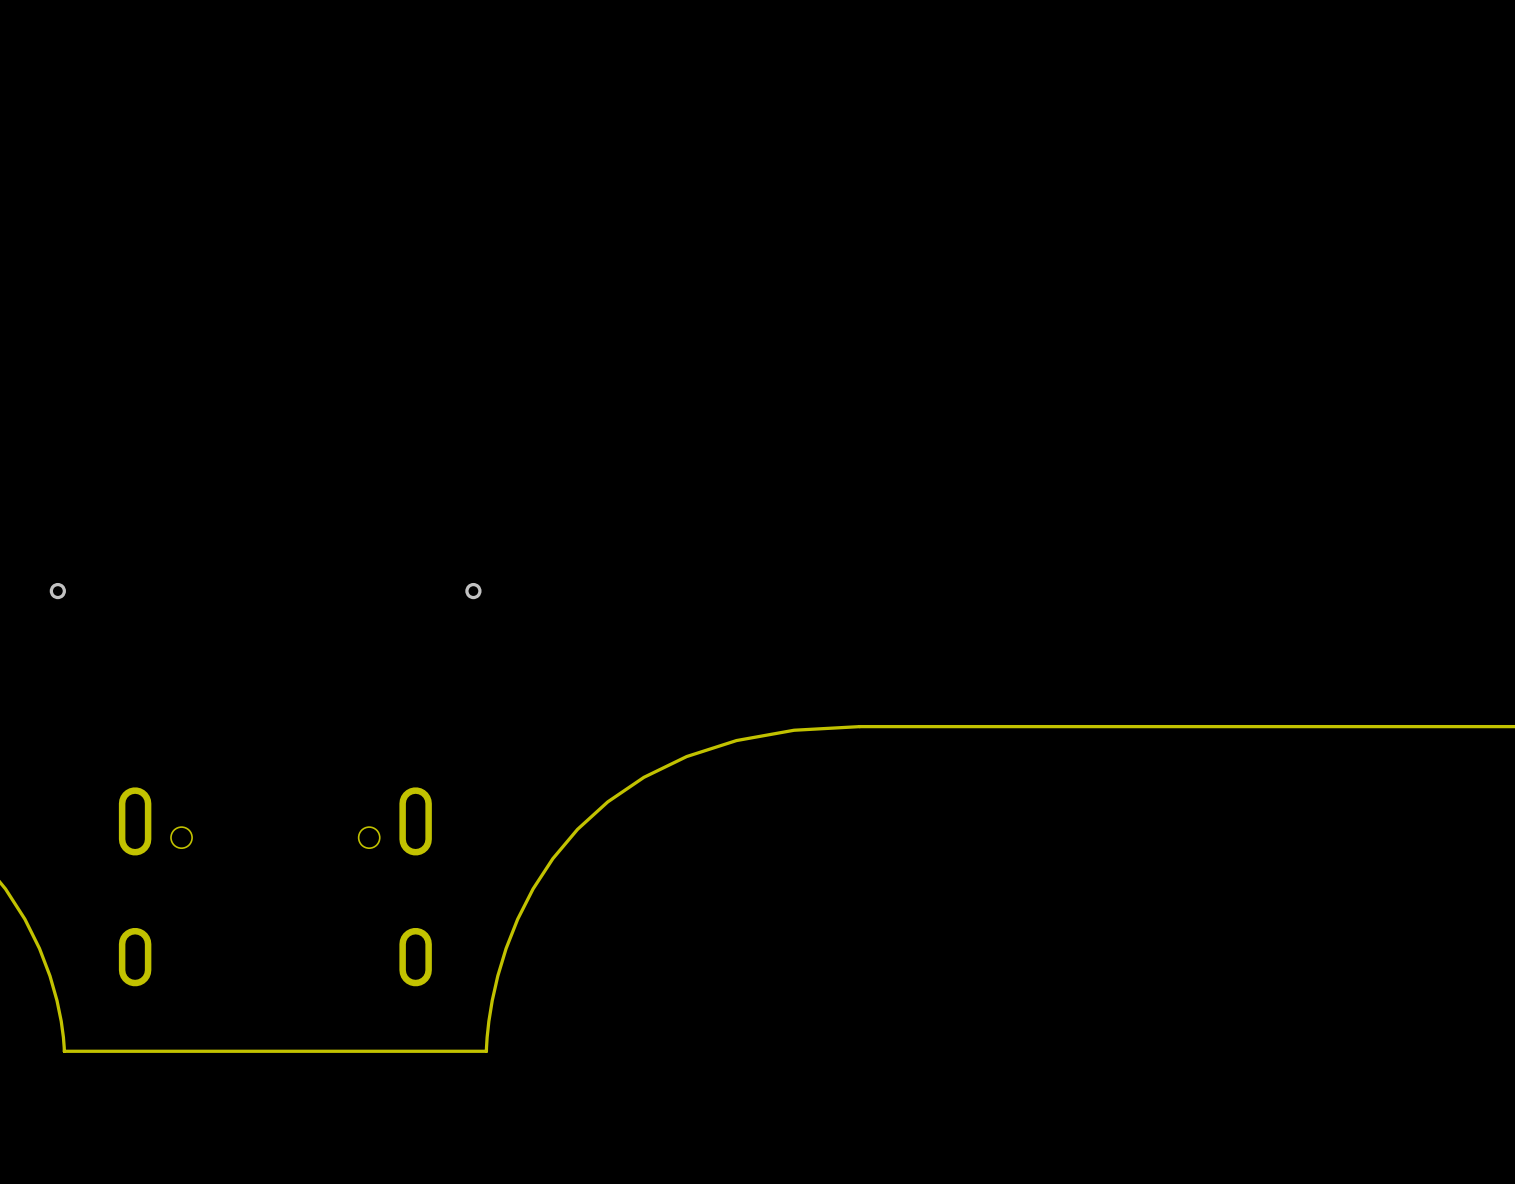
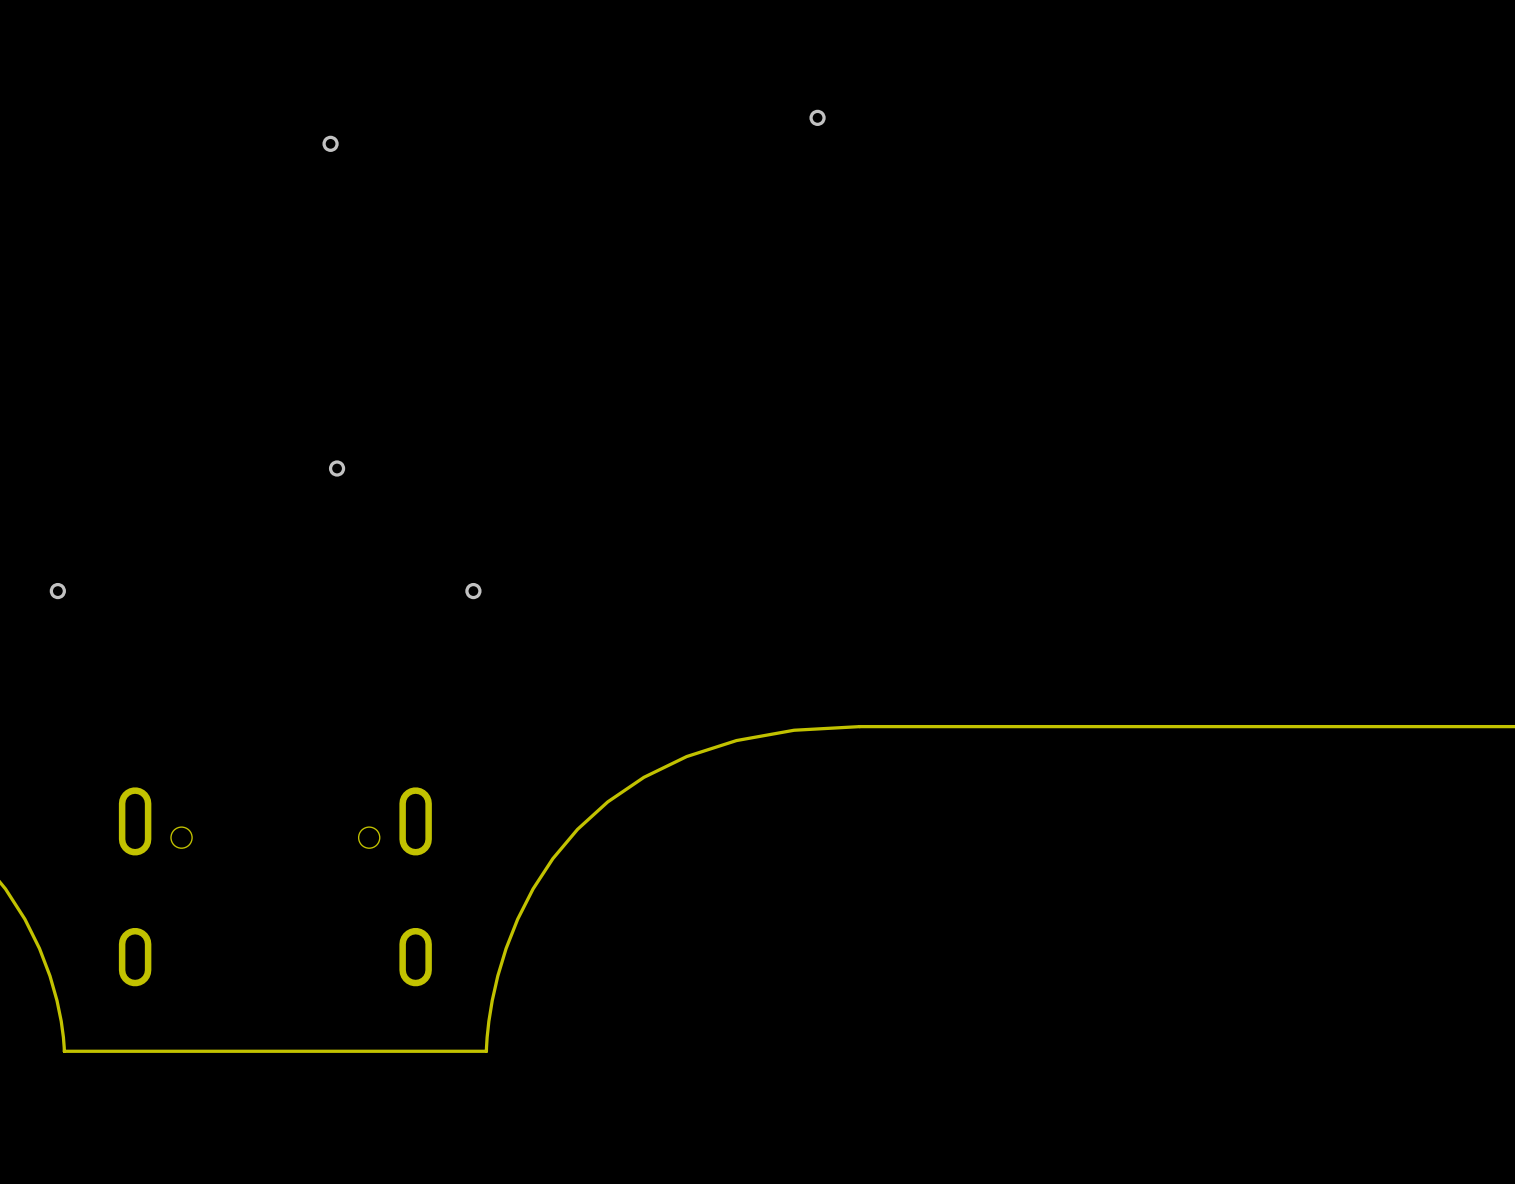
via: none -> (817, 117)
via: none -> (330, 143)
via: none -> (337, 468)

